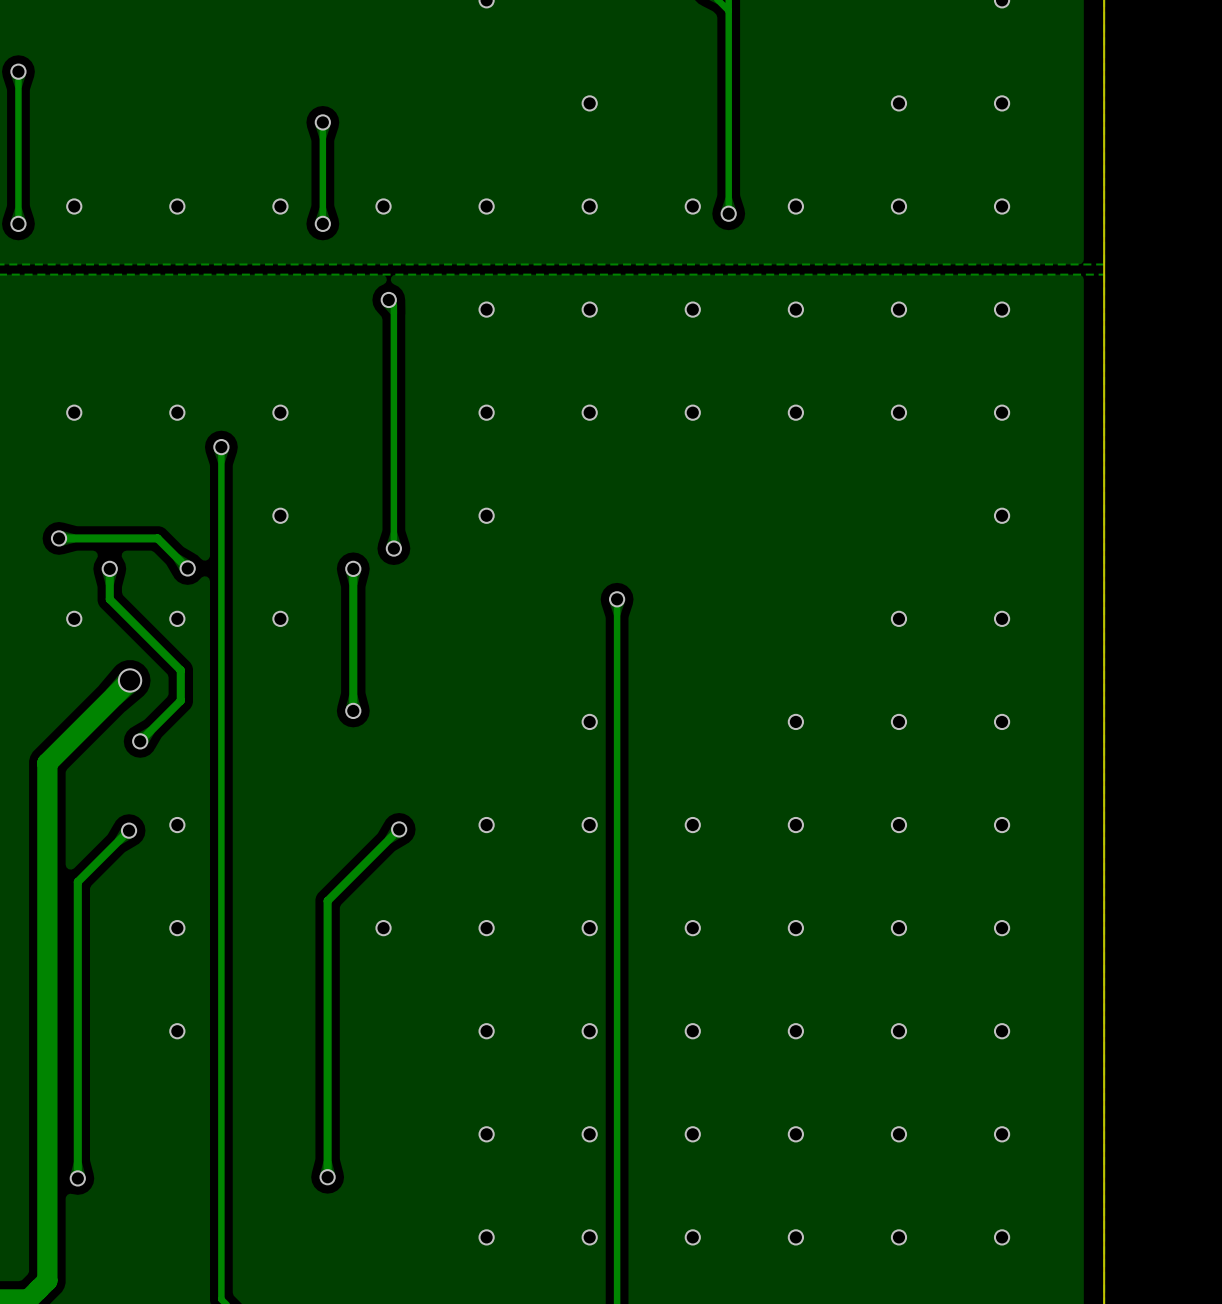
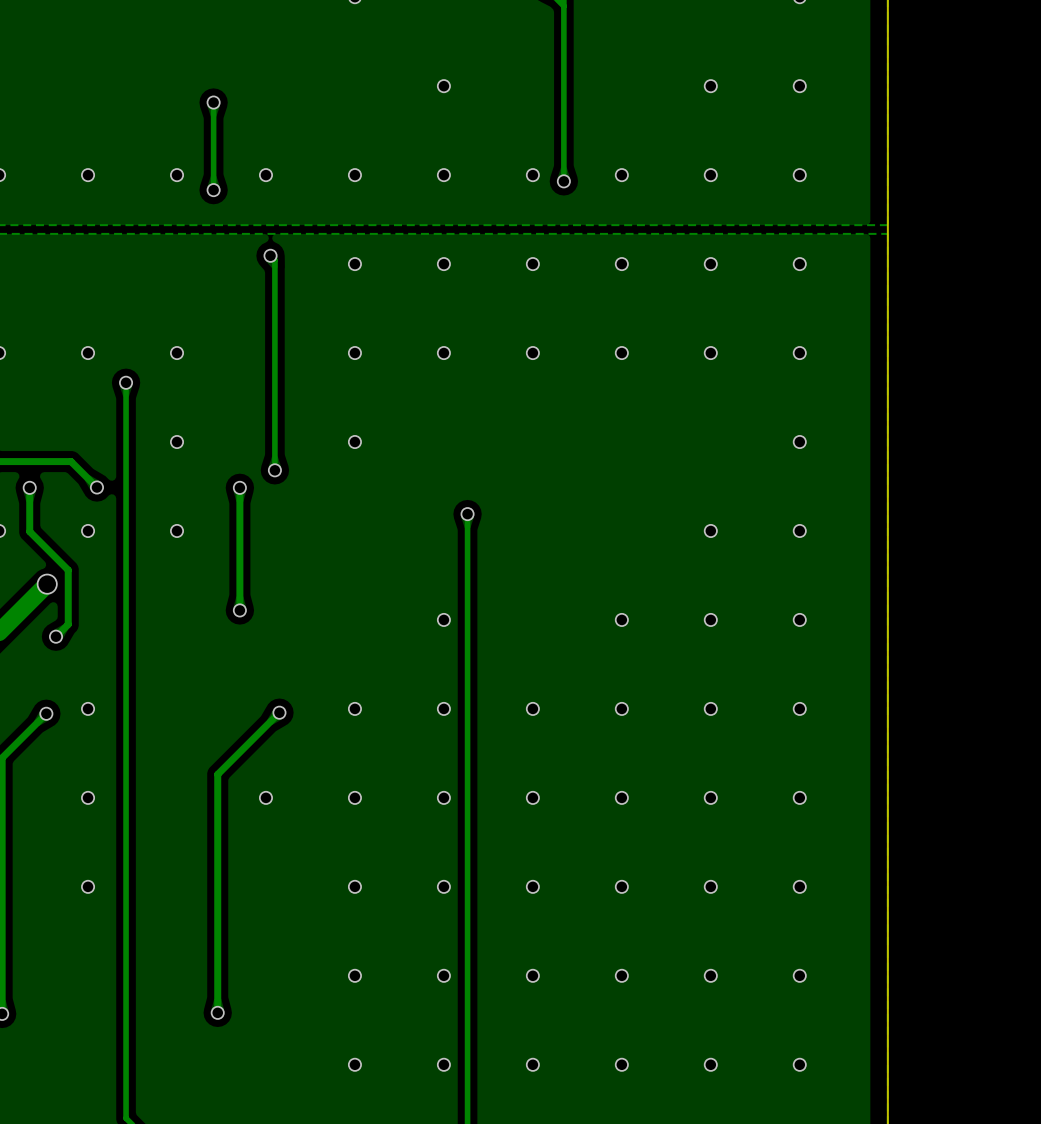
track: (109, 599) (180, 670) (180, 700) (154, 727) -> (29, 514) (29, 531) (68, 570) (68, 624)

